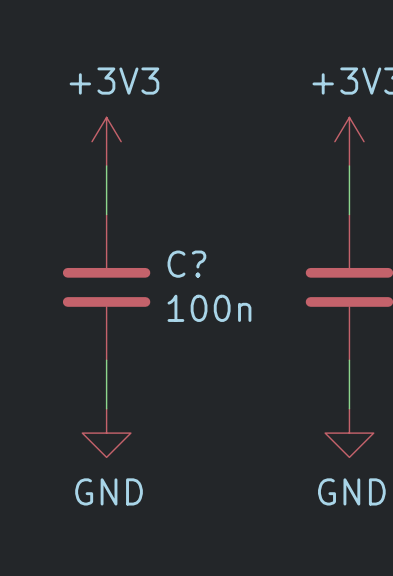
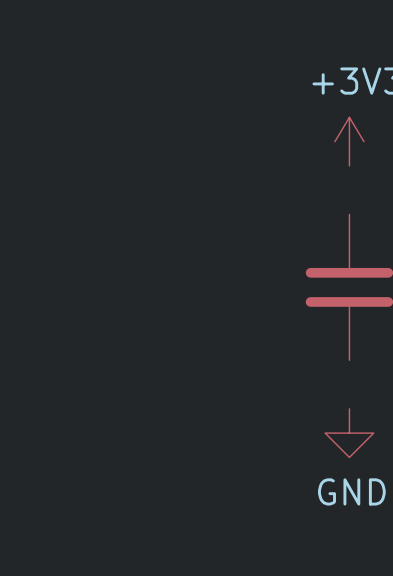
power symbol: +3V3 (106, 141) -> none
wire: (106, 165) (106, 214) -> none
wire: (349, 165) (349, 214) -> none
C?: 100n (106, 287) -> none
wire: (106, 360) (106, 408) -> none
wire: (349, 360) (349, 408) -> none
power symbol: GND (106, 433) -> none

